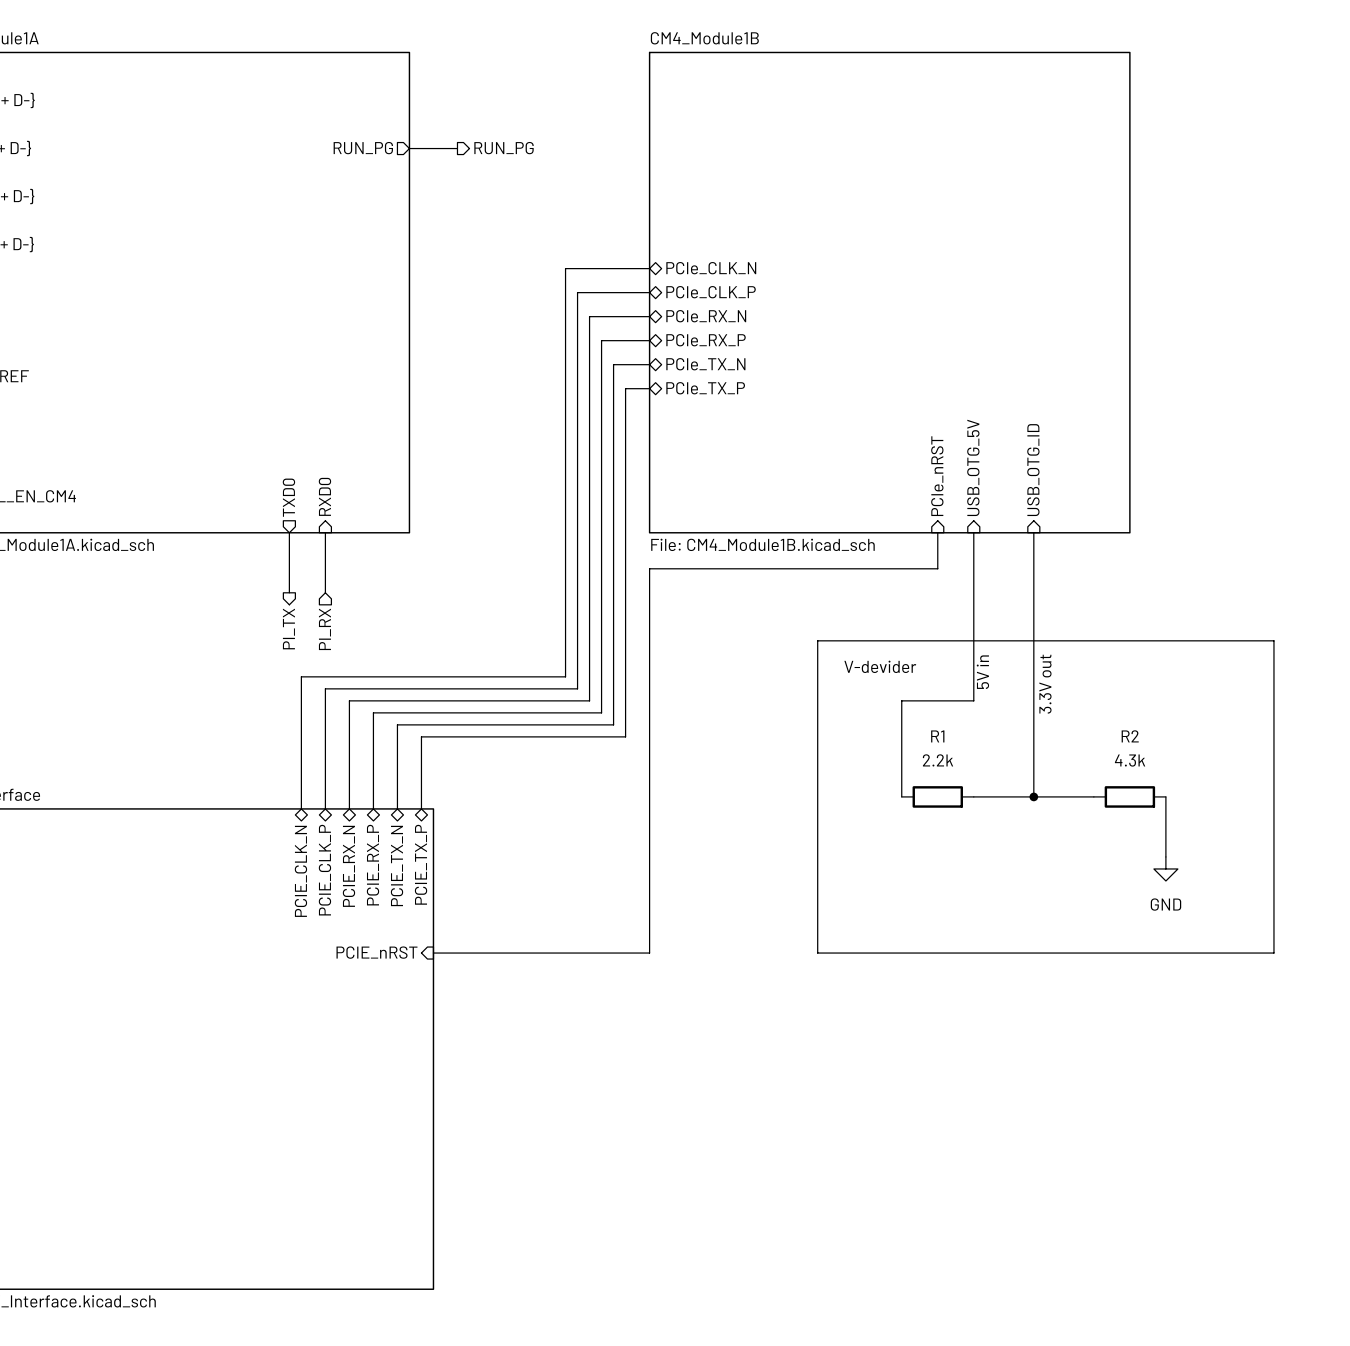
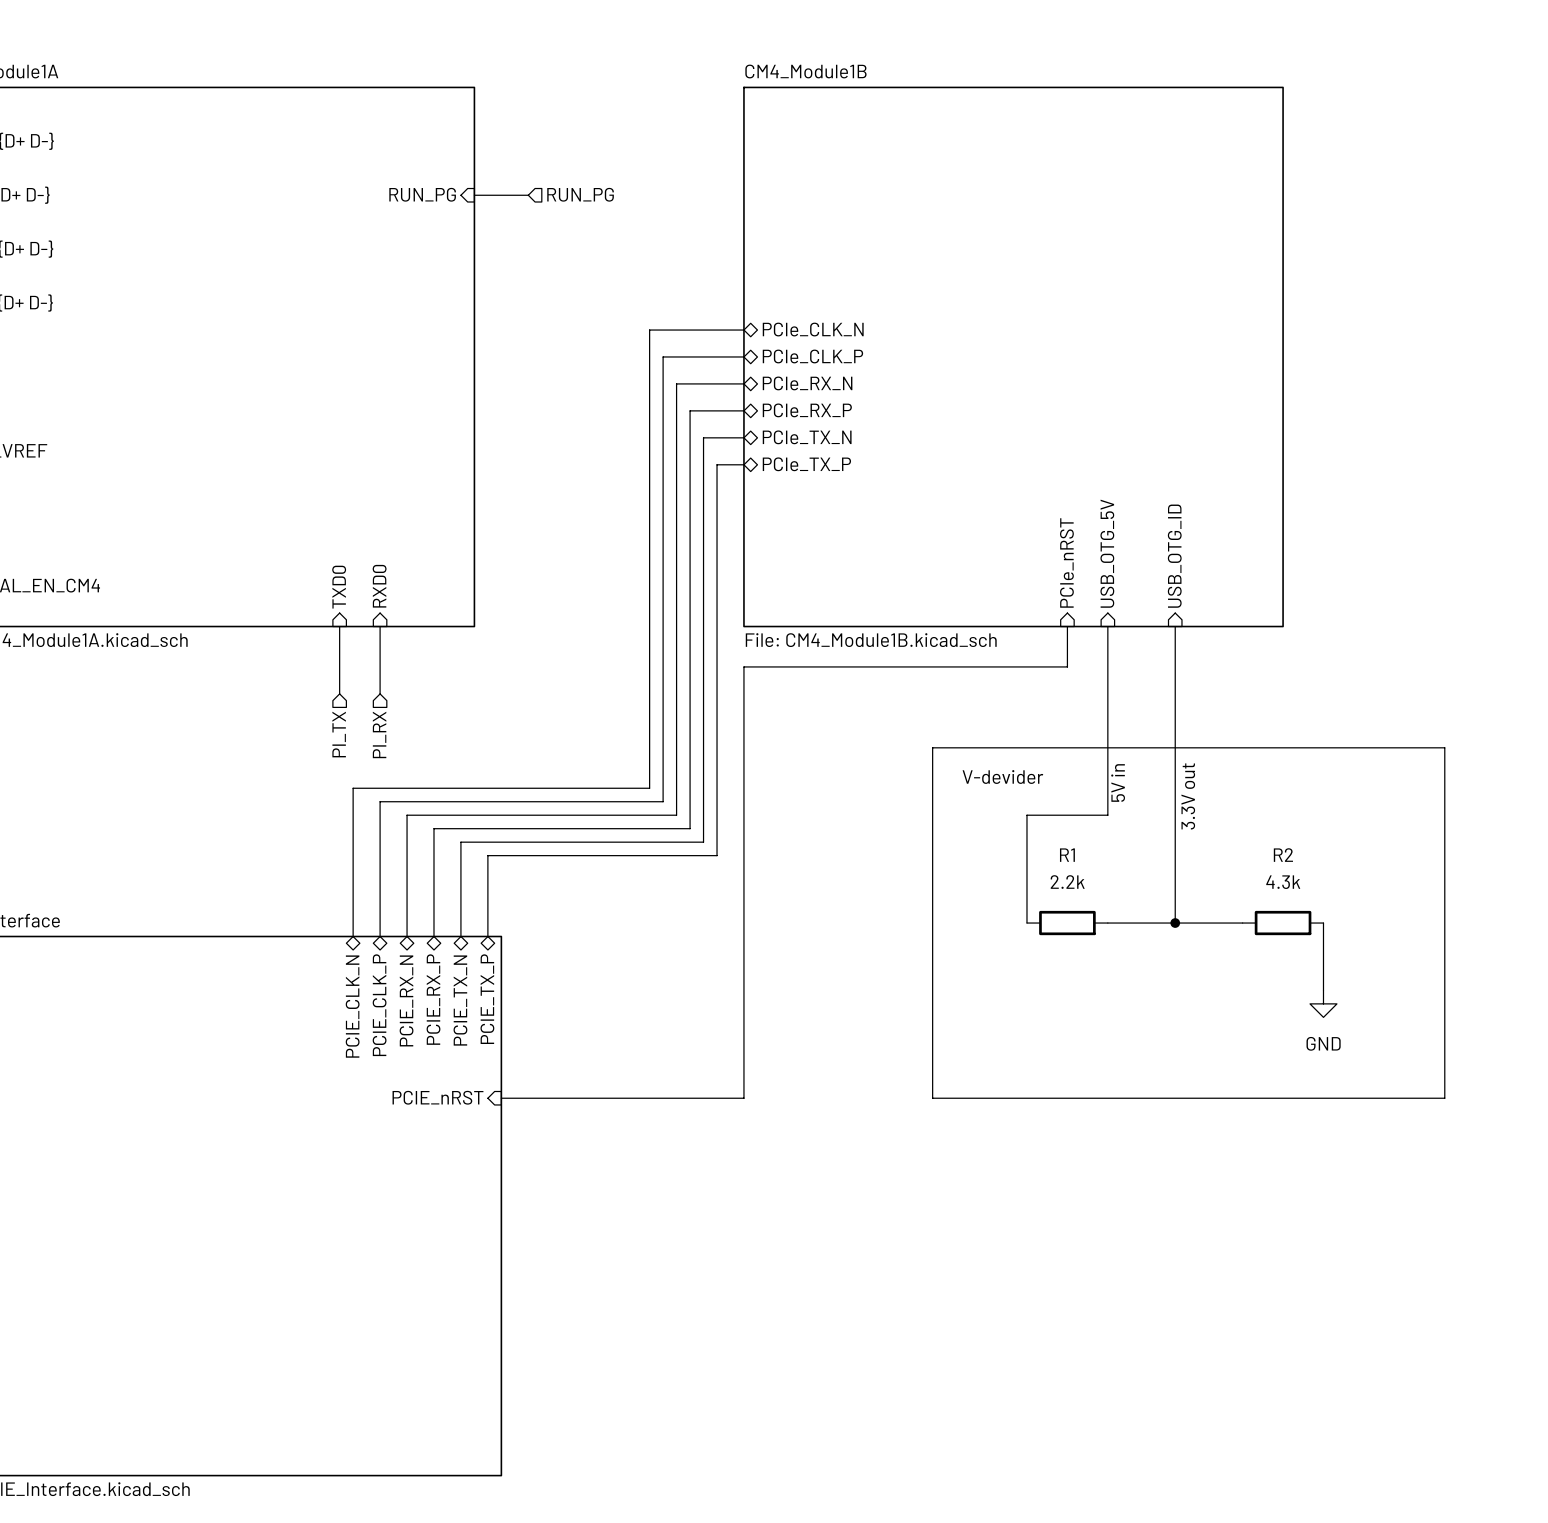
sheet pin shape: output (363, 148) -> input (422, 194)
hierarchical label shape: output (504, 148) -> input (580, 194)
sheet pin shape: output (288, 497) -> input (339, 587)
hierarchical label shape: output (288, 629) -> input (339, 734)

